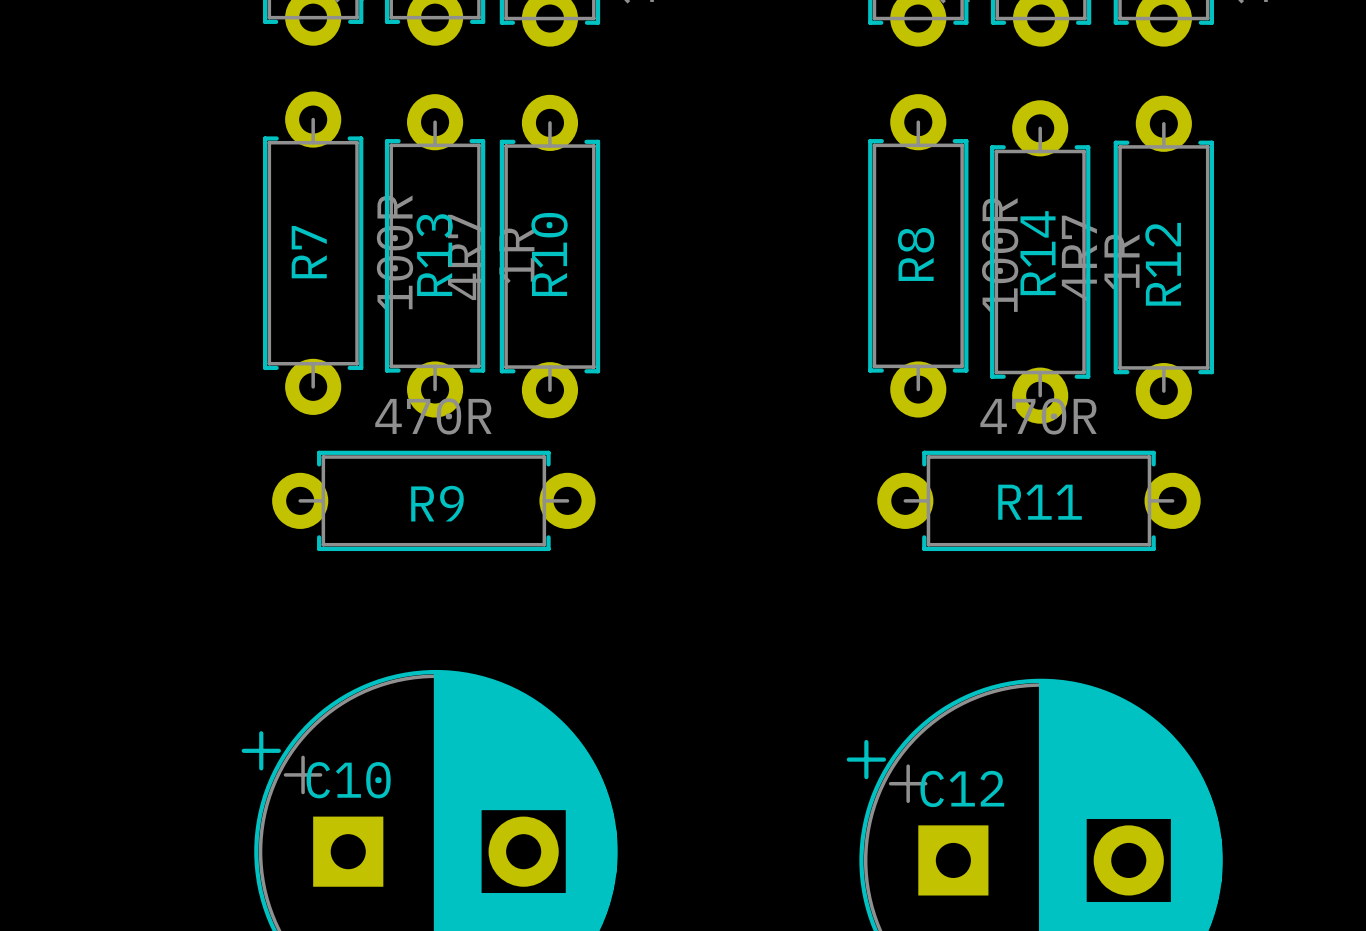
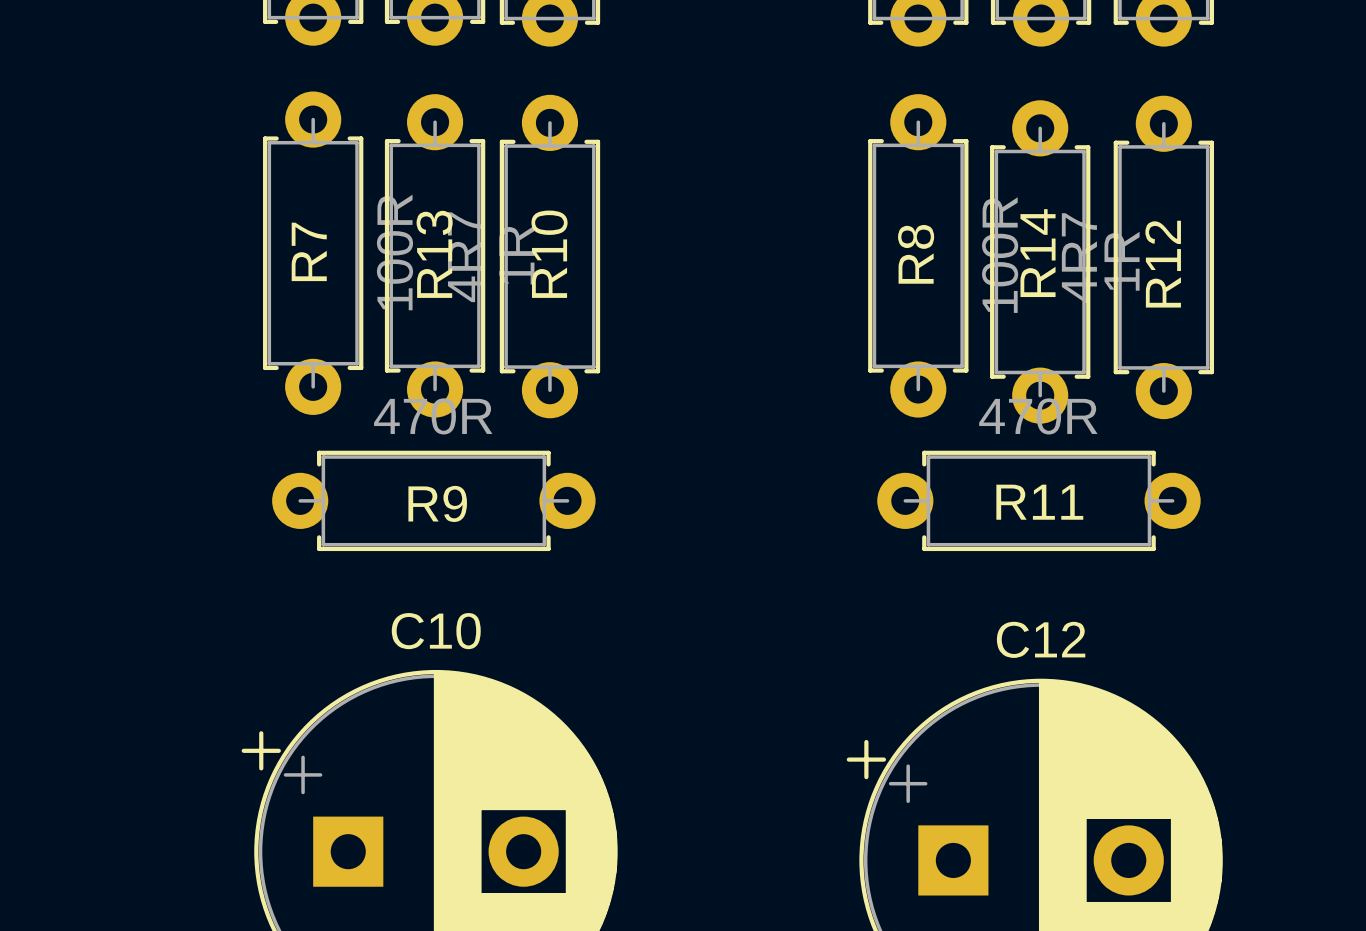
C10 name position: C10 (348, 780) -> C10 (436, 631)
C12 name position: C12 (962, 788) -> C12 (1041, 639)

